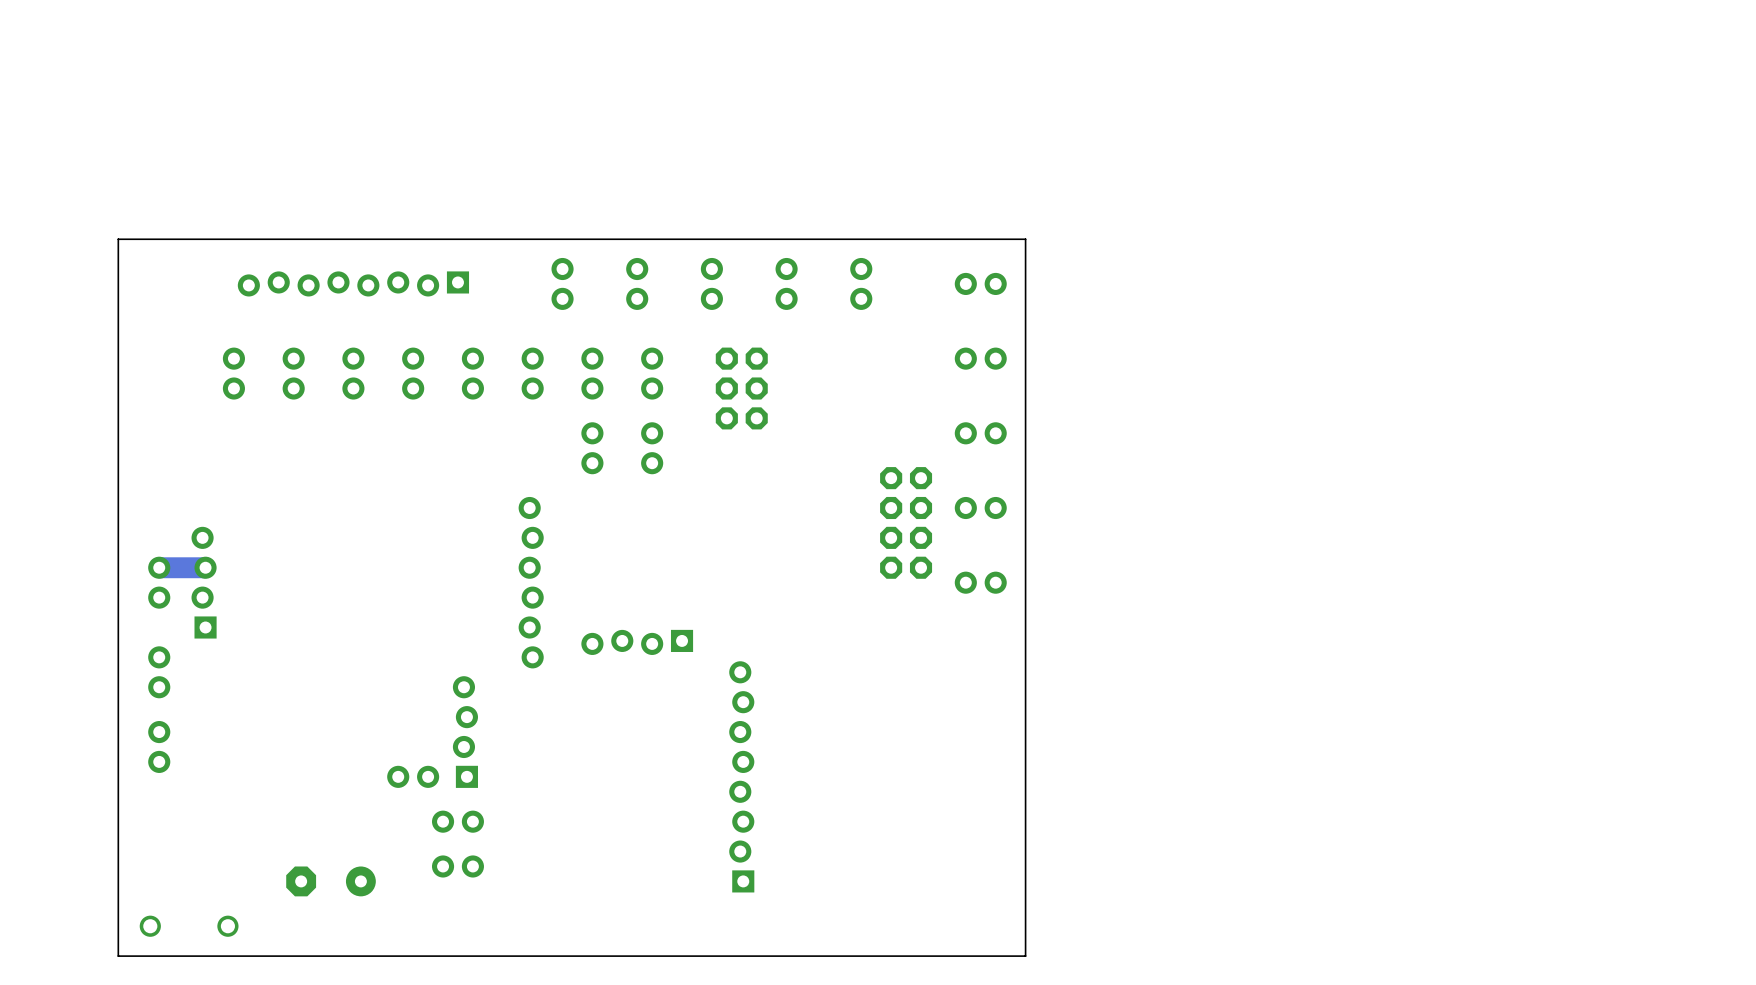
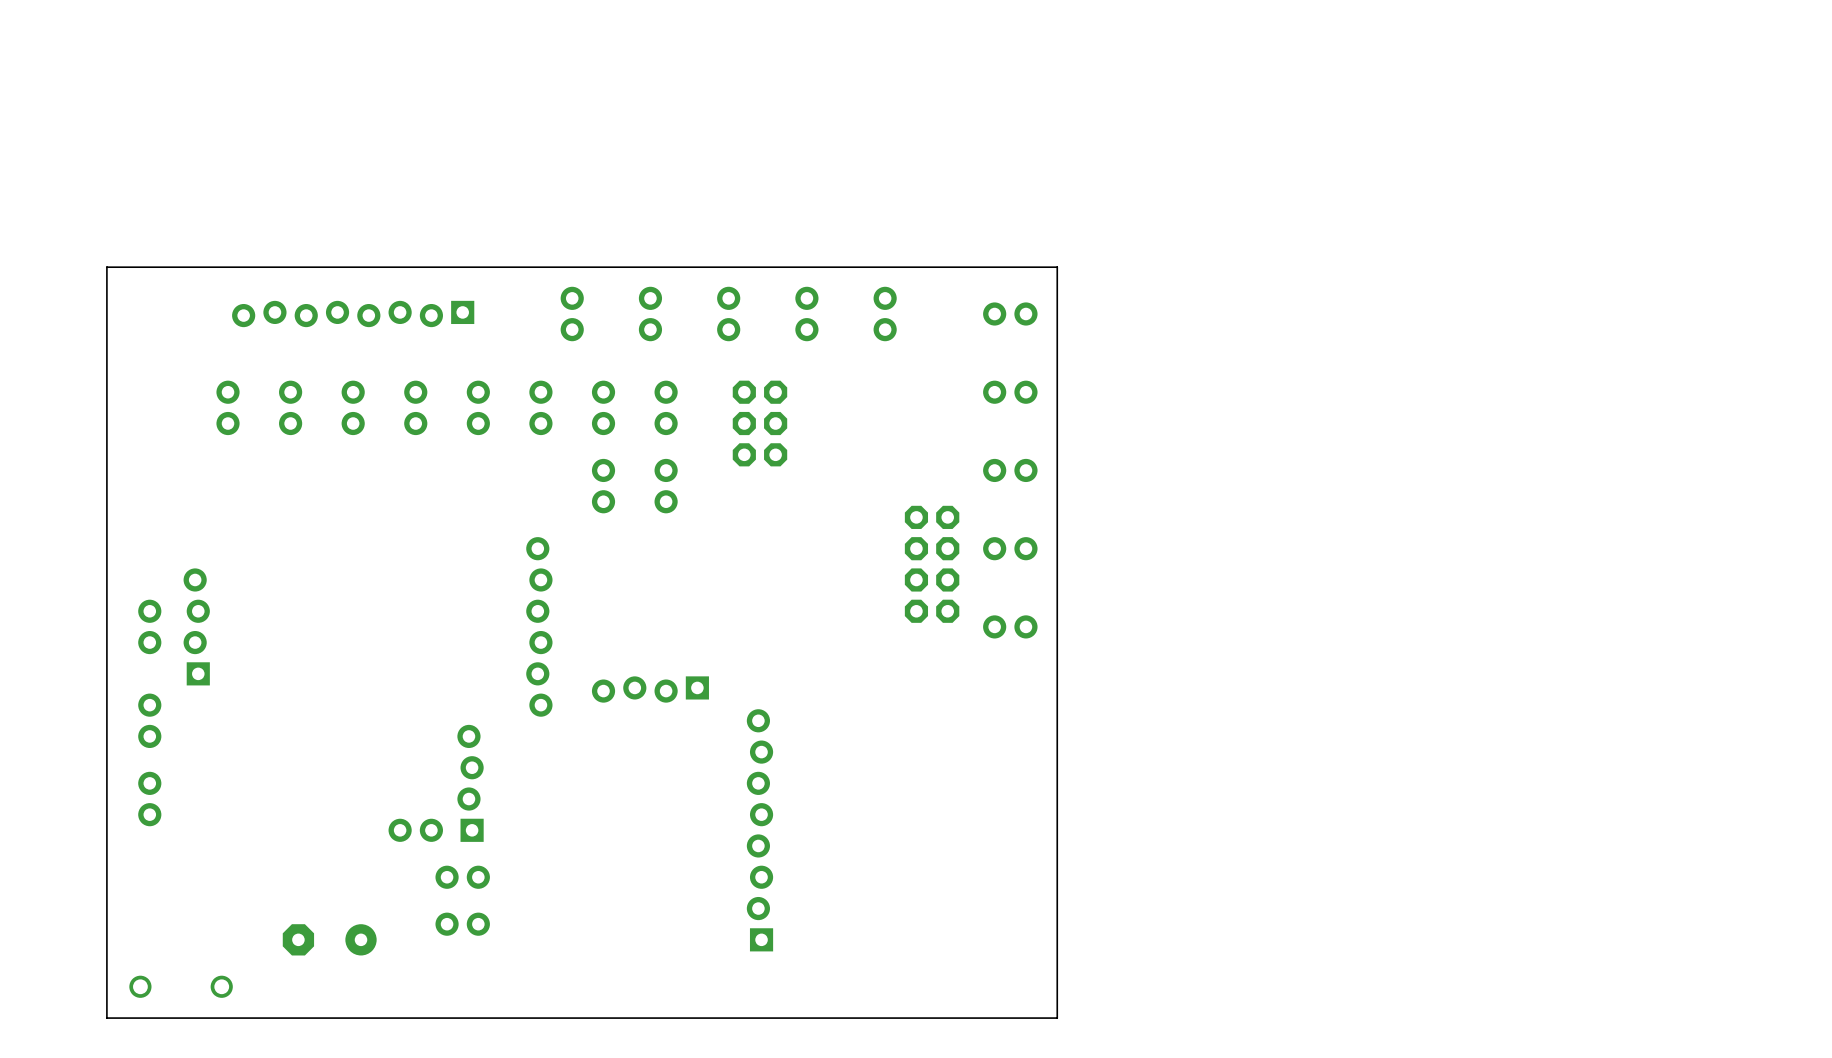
track: (205, 567) (159, 567) -> none

